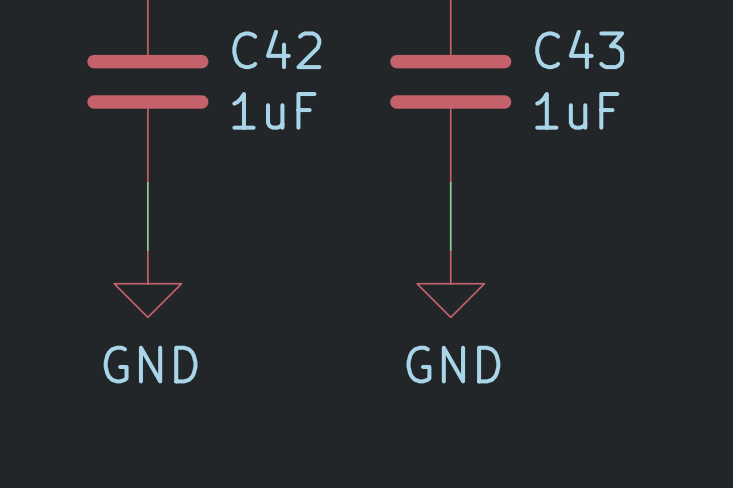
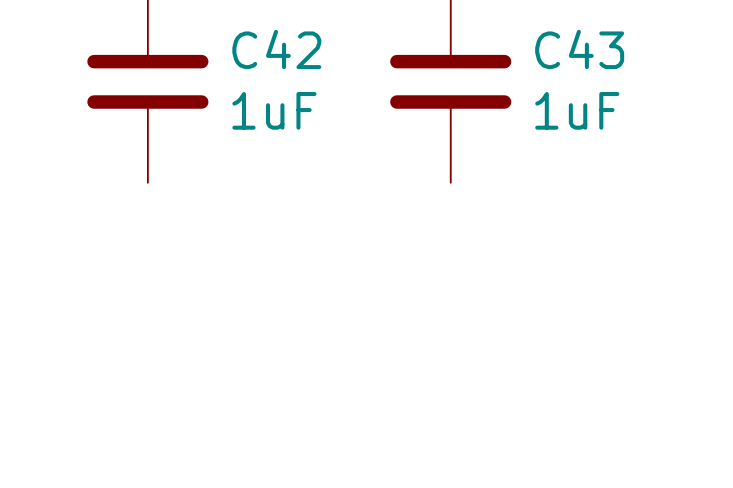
wire: (147, 182) (147, 250) -> none
wire: (450, 182) (450, 250) -> none
power symbol: GND (147, 283) -> none
power symbol: GND (450, 283) -> none

